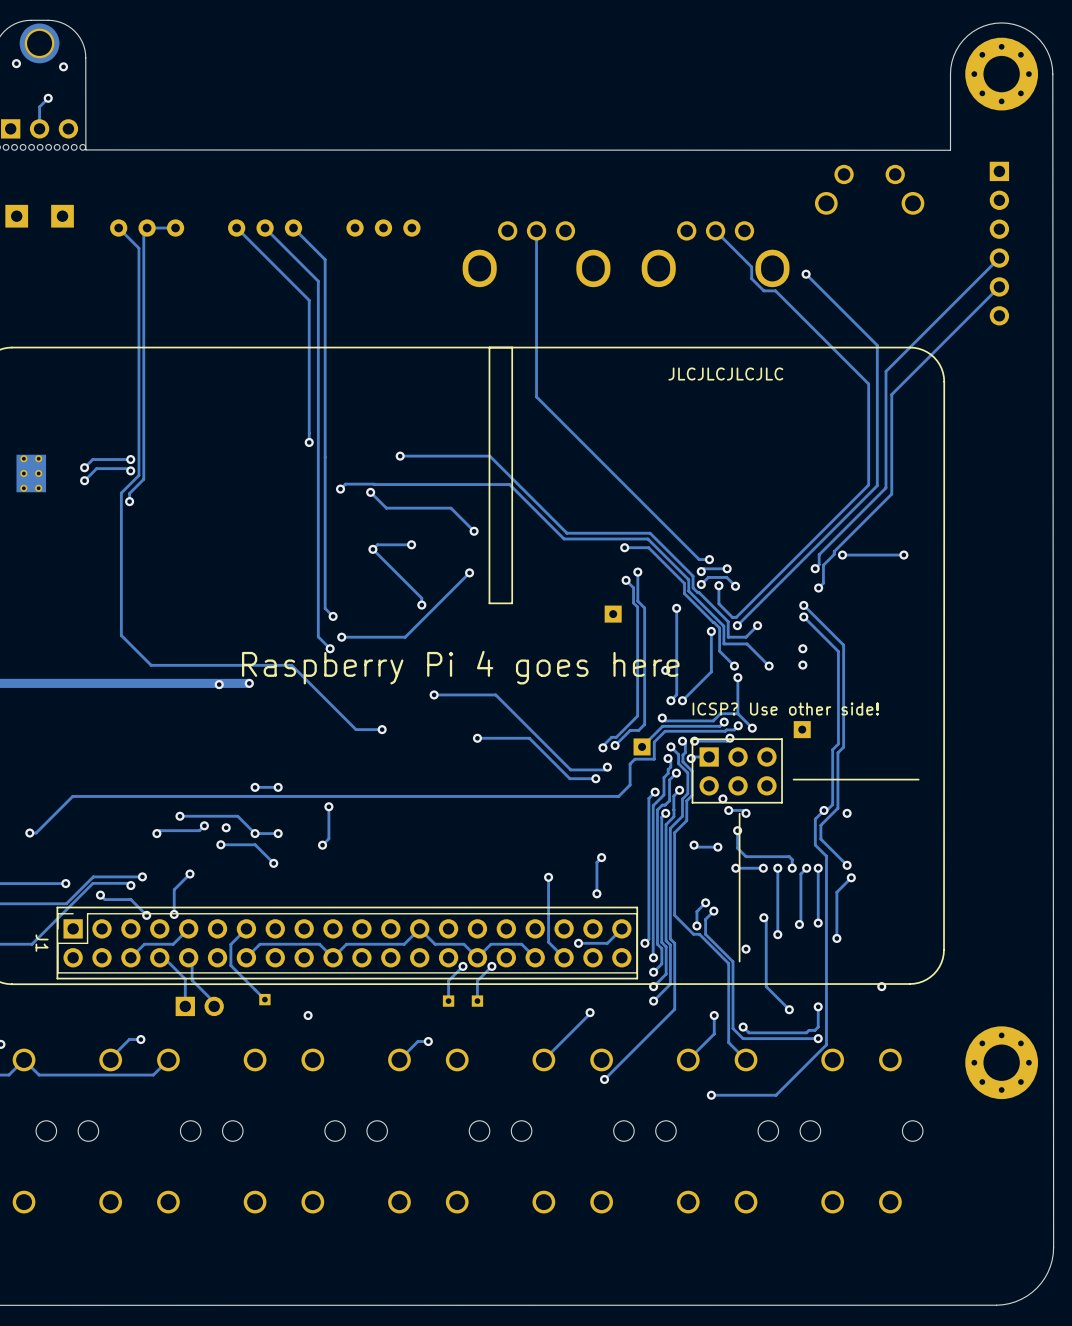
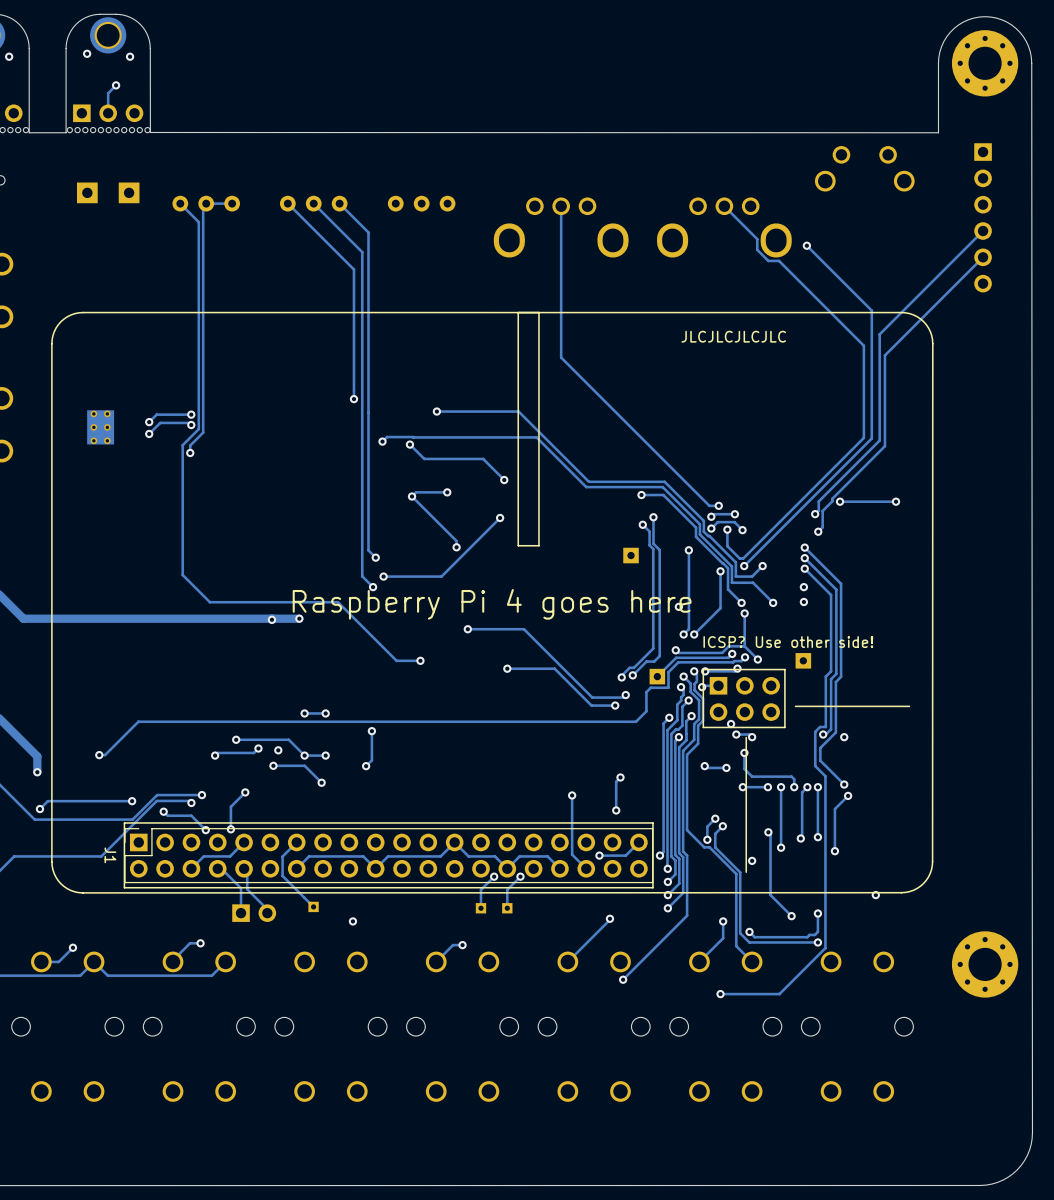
via: none -> (804, 568)
track: (824, 810) (815, 819) -> (804, 568) (831, 595) (831, 671) (825, 676) (825, 727) (820, 727) (815, 731) (815, 742)

